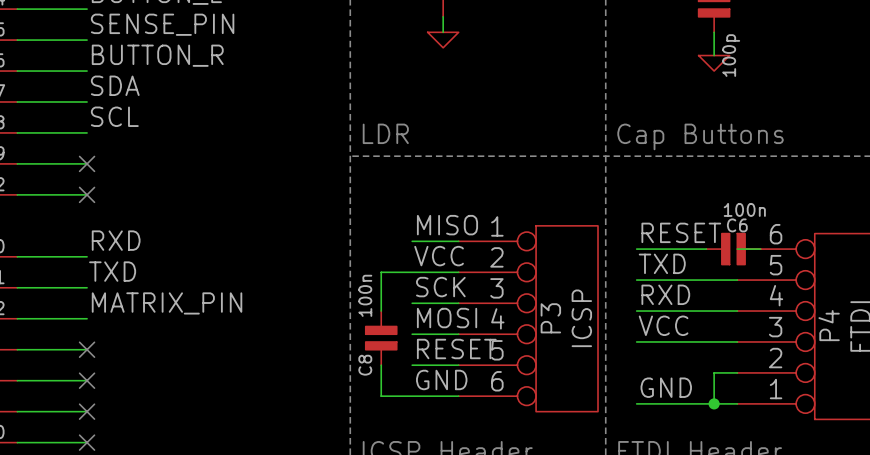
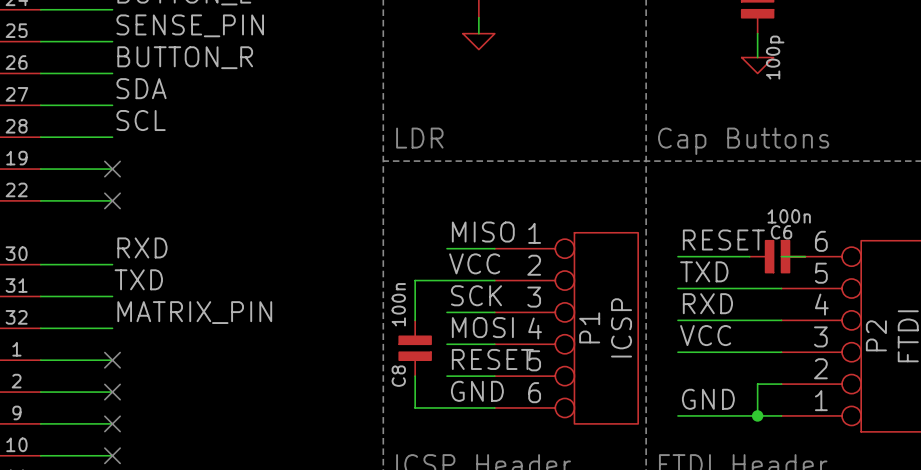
P3 name: P3 (550, 318) -> P1 (589, 327)
P4 name: P4 (829, 325) -> P2 (876, 335)

